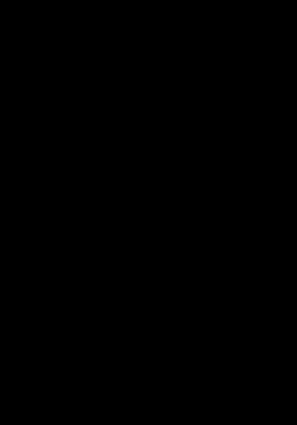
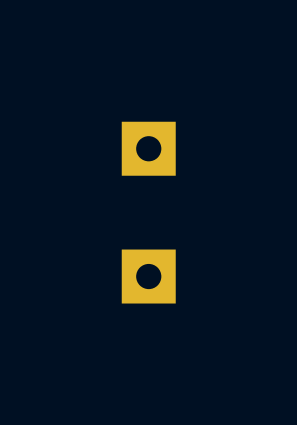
part: none -> (148, 148)
part: none -> (148, 276)

